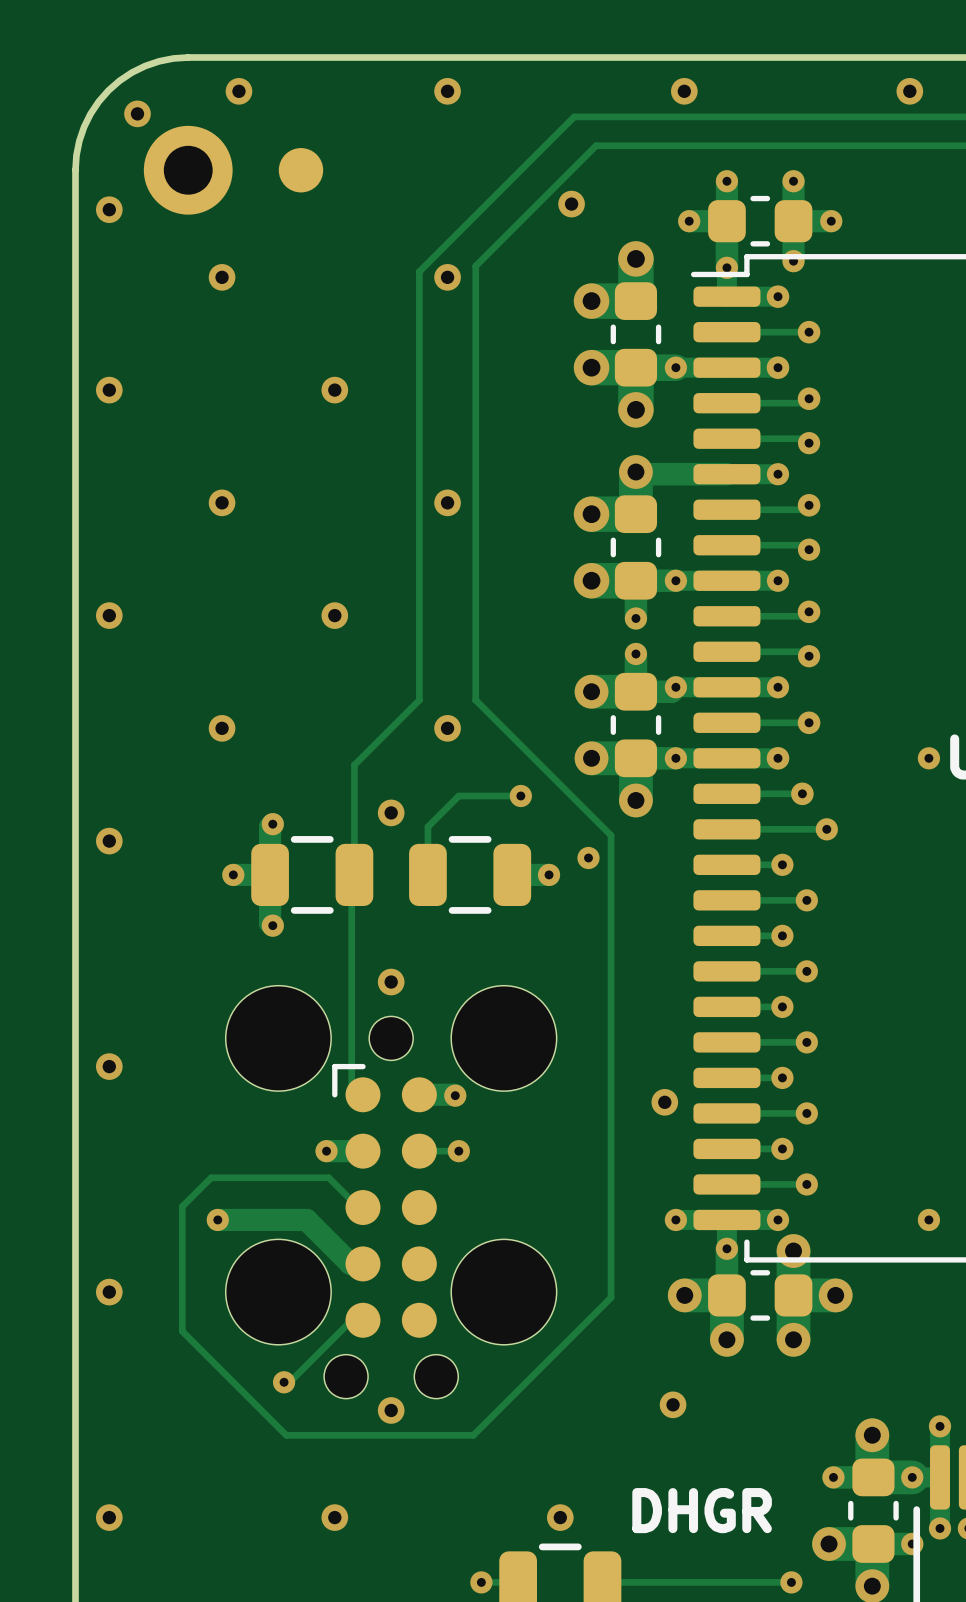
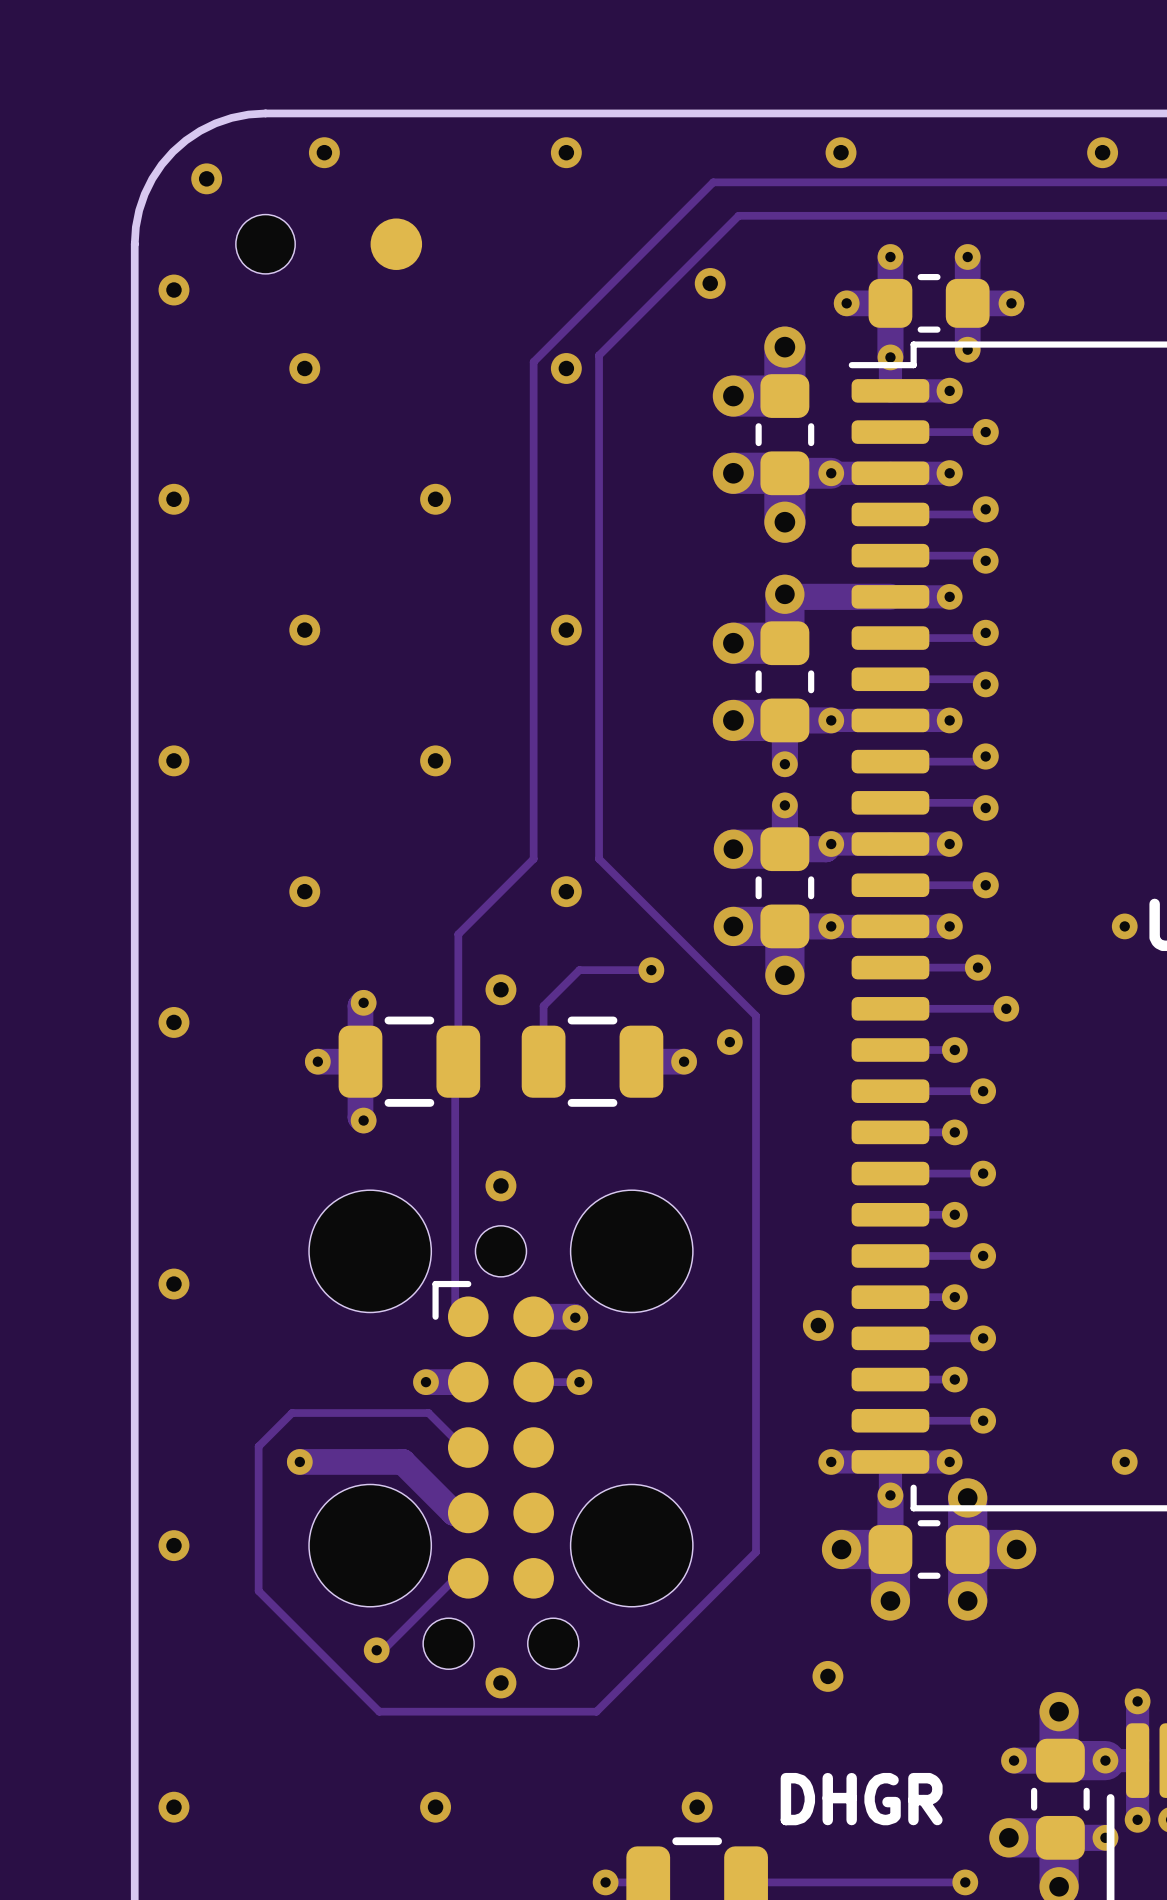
part footprint: [143, 125, 233, 215] -> [235, 214, 296, 274]

